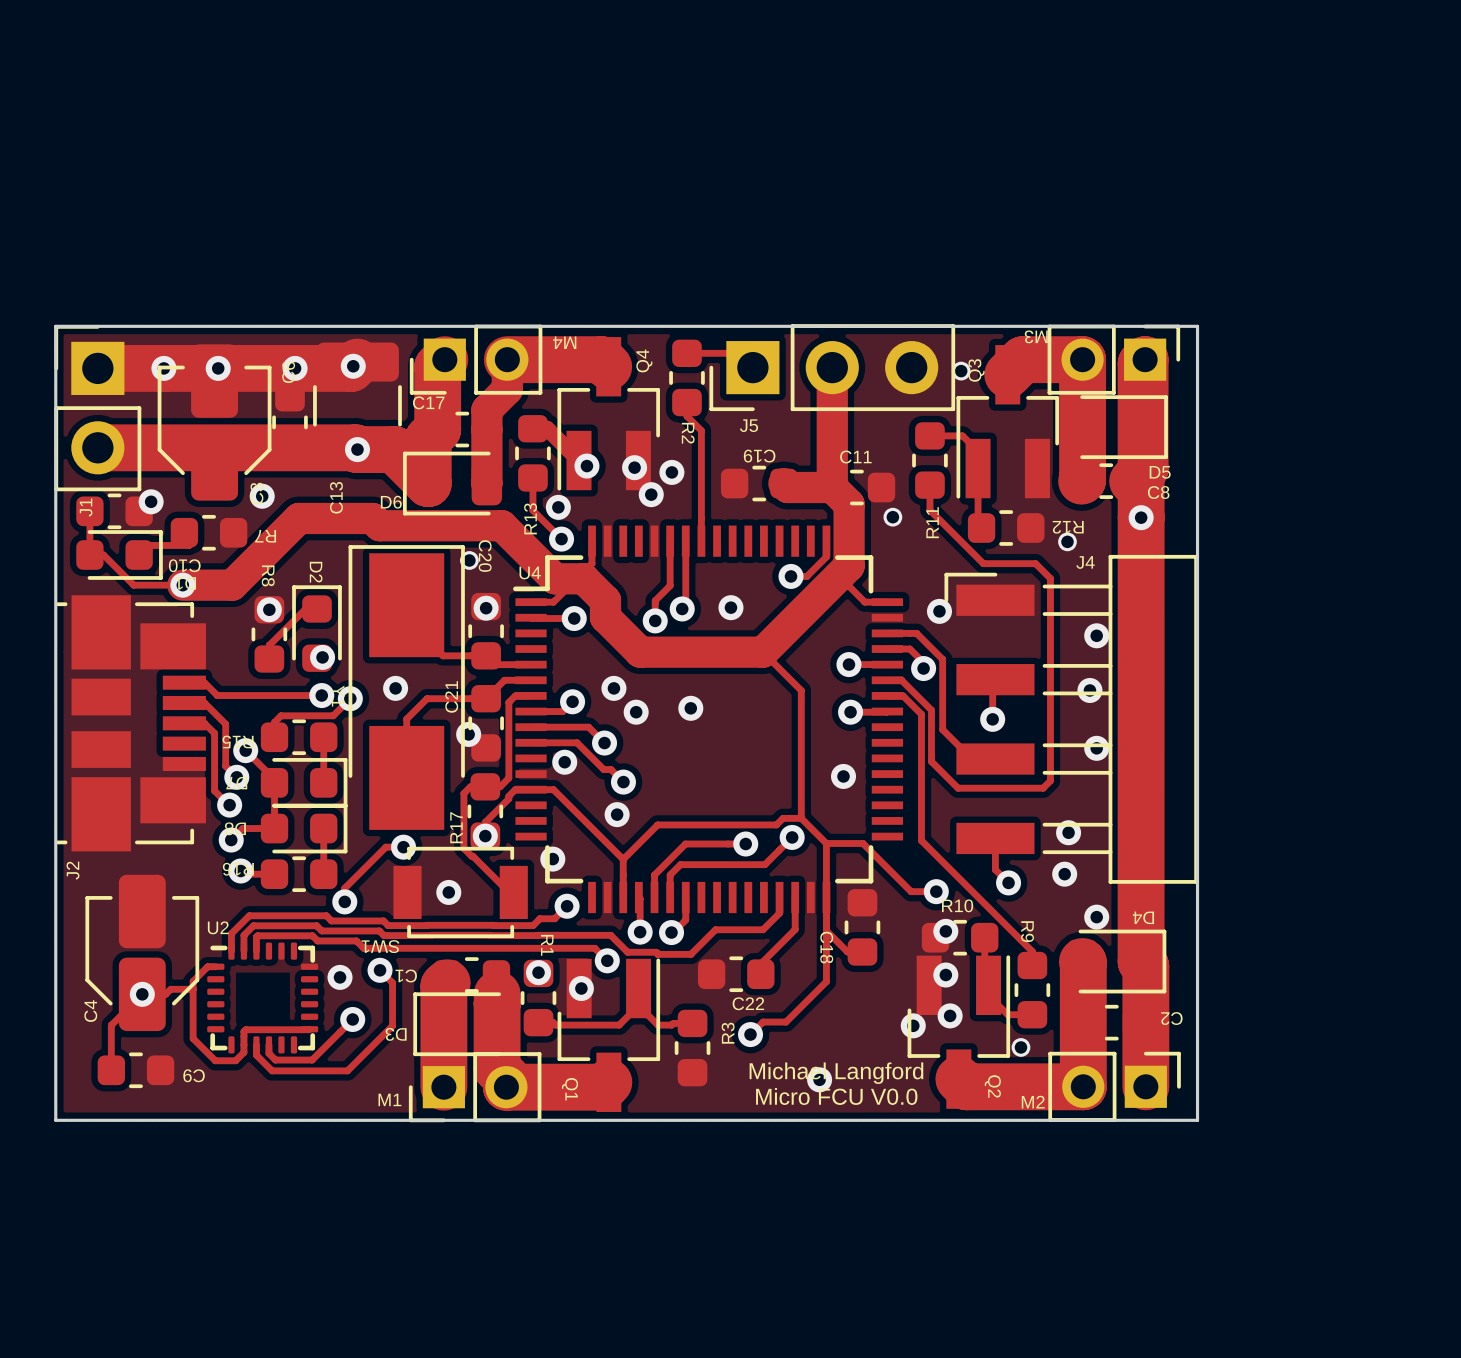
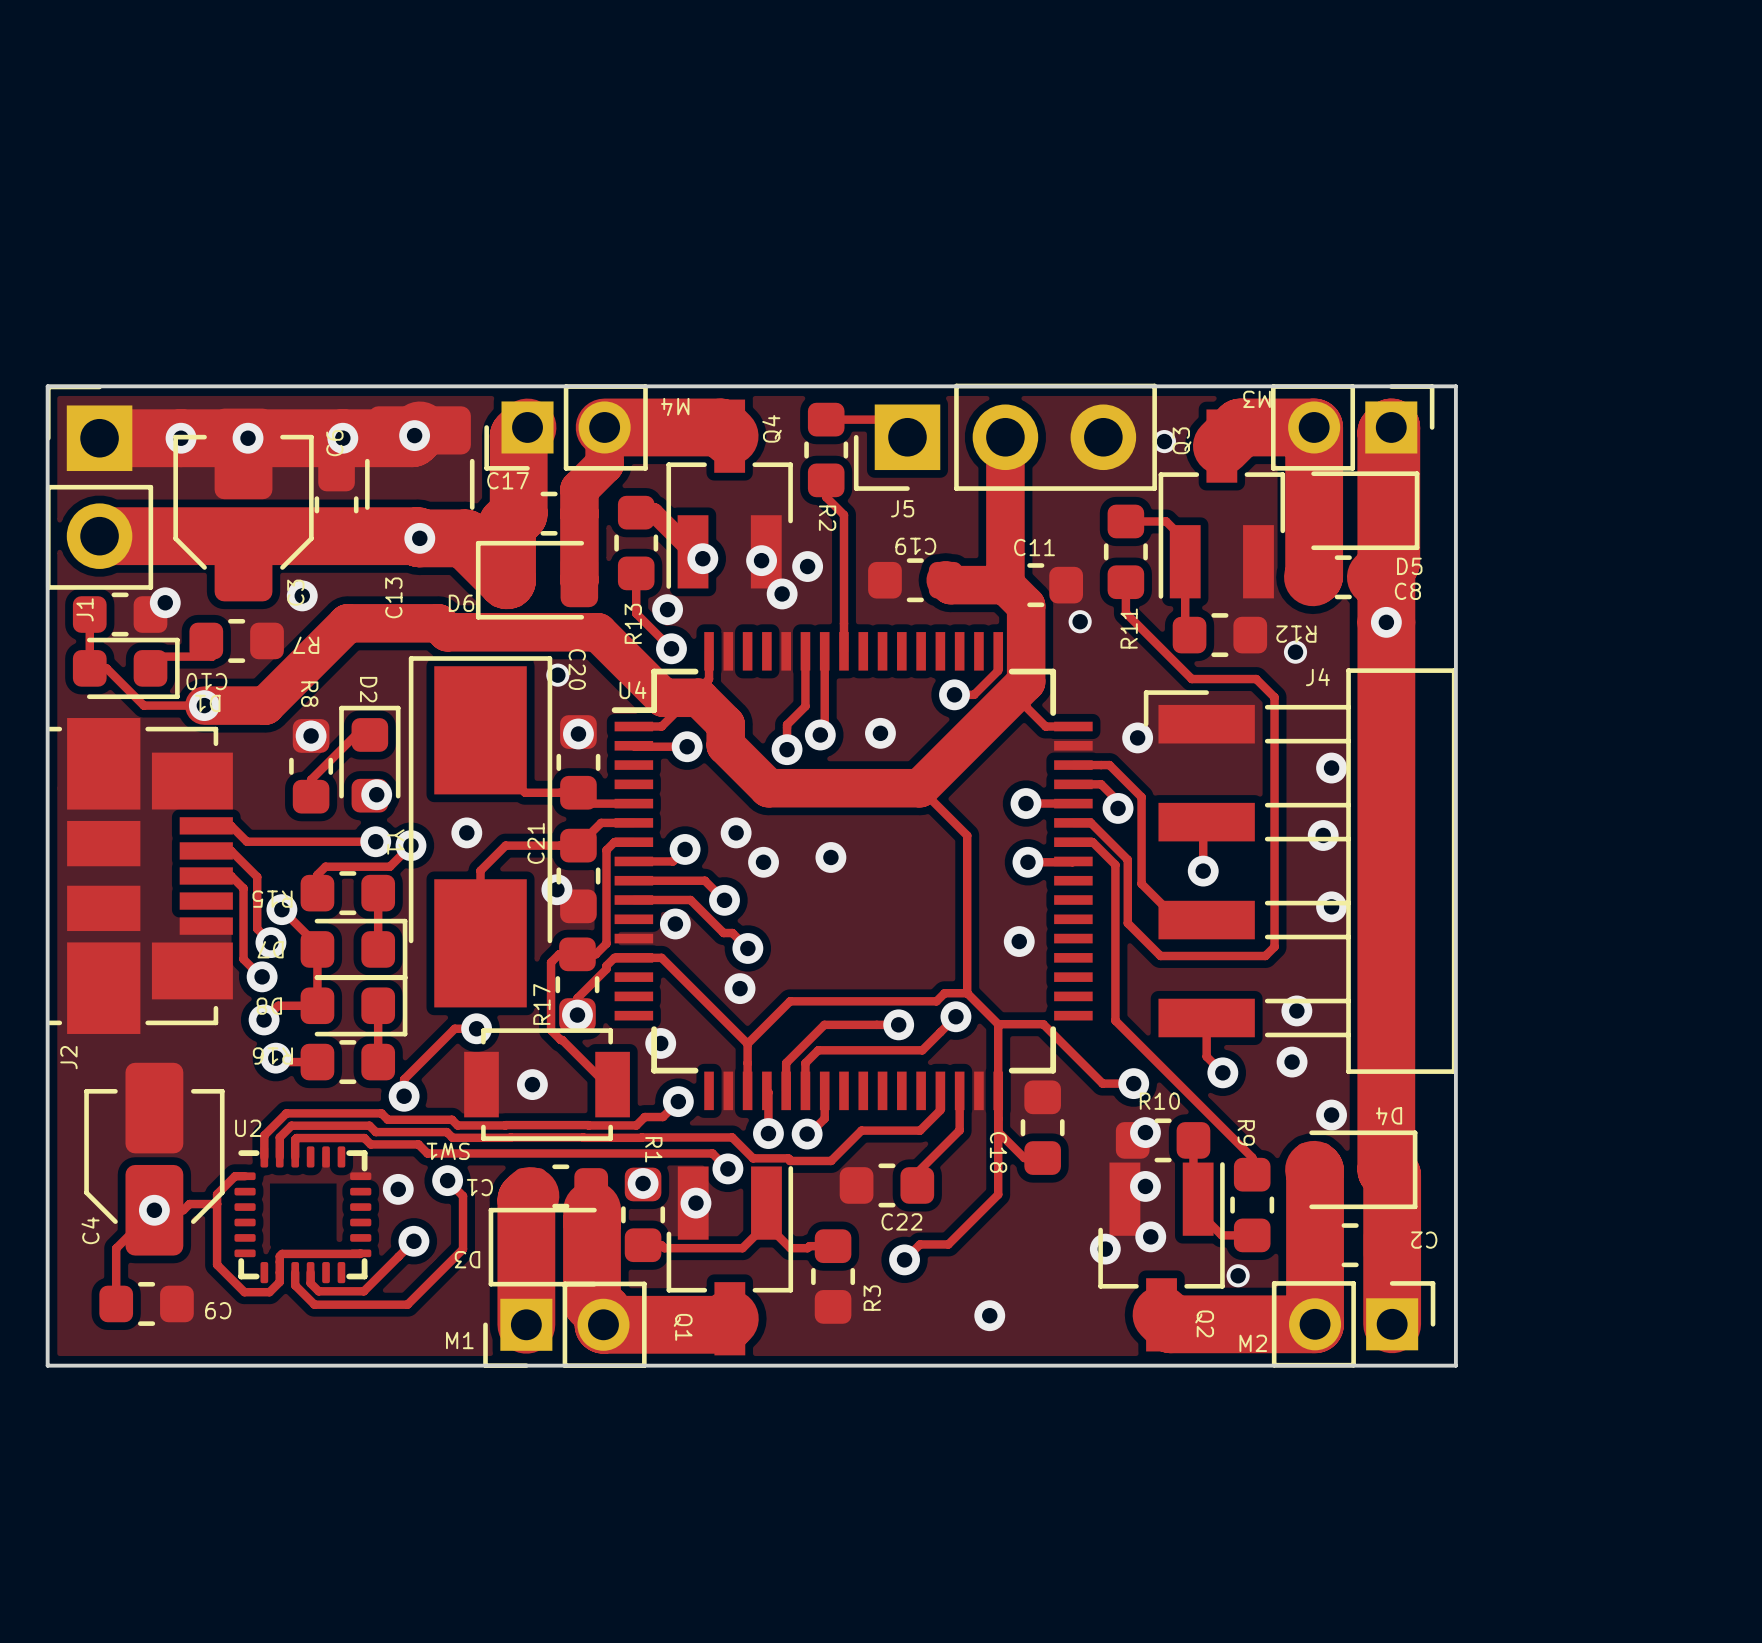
R3 name position: R3 (728, 1033) -> R3 (872, 1298)
text: Michael Langford (836, 1073) -> none
text: Micro FCU V0.0 (836, 1096) -> none

